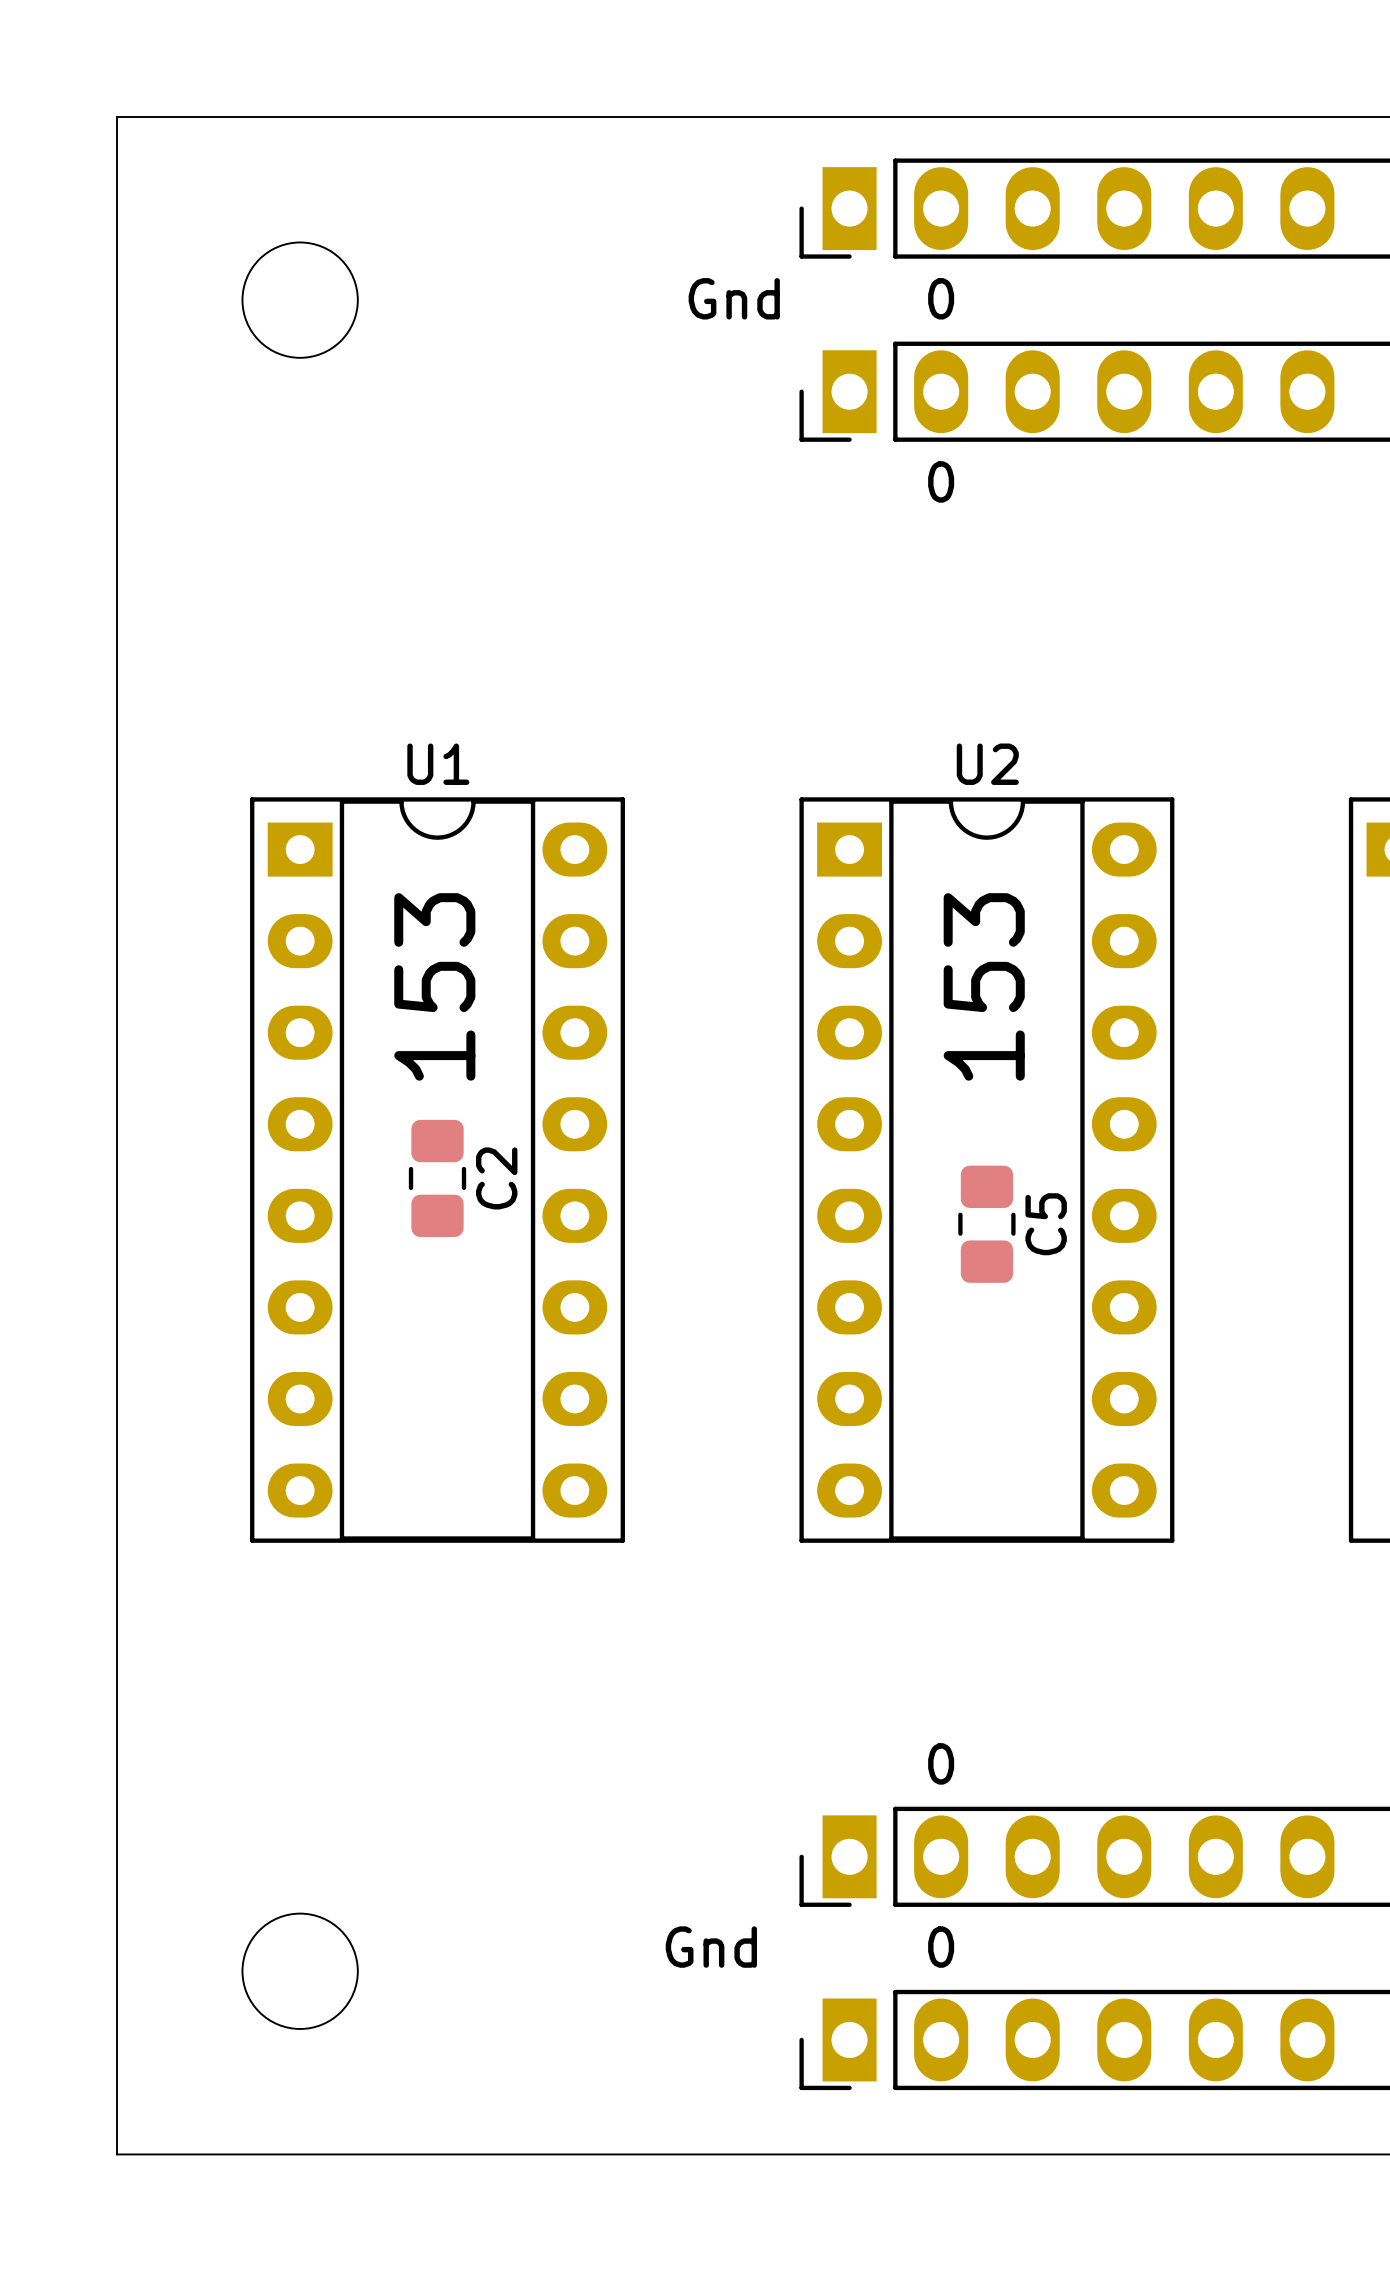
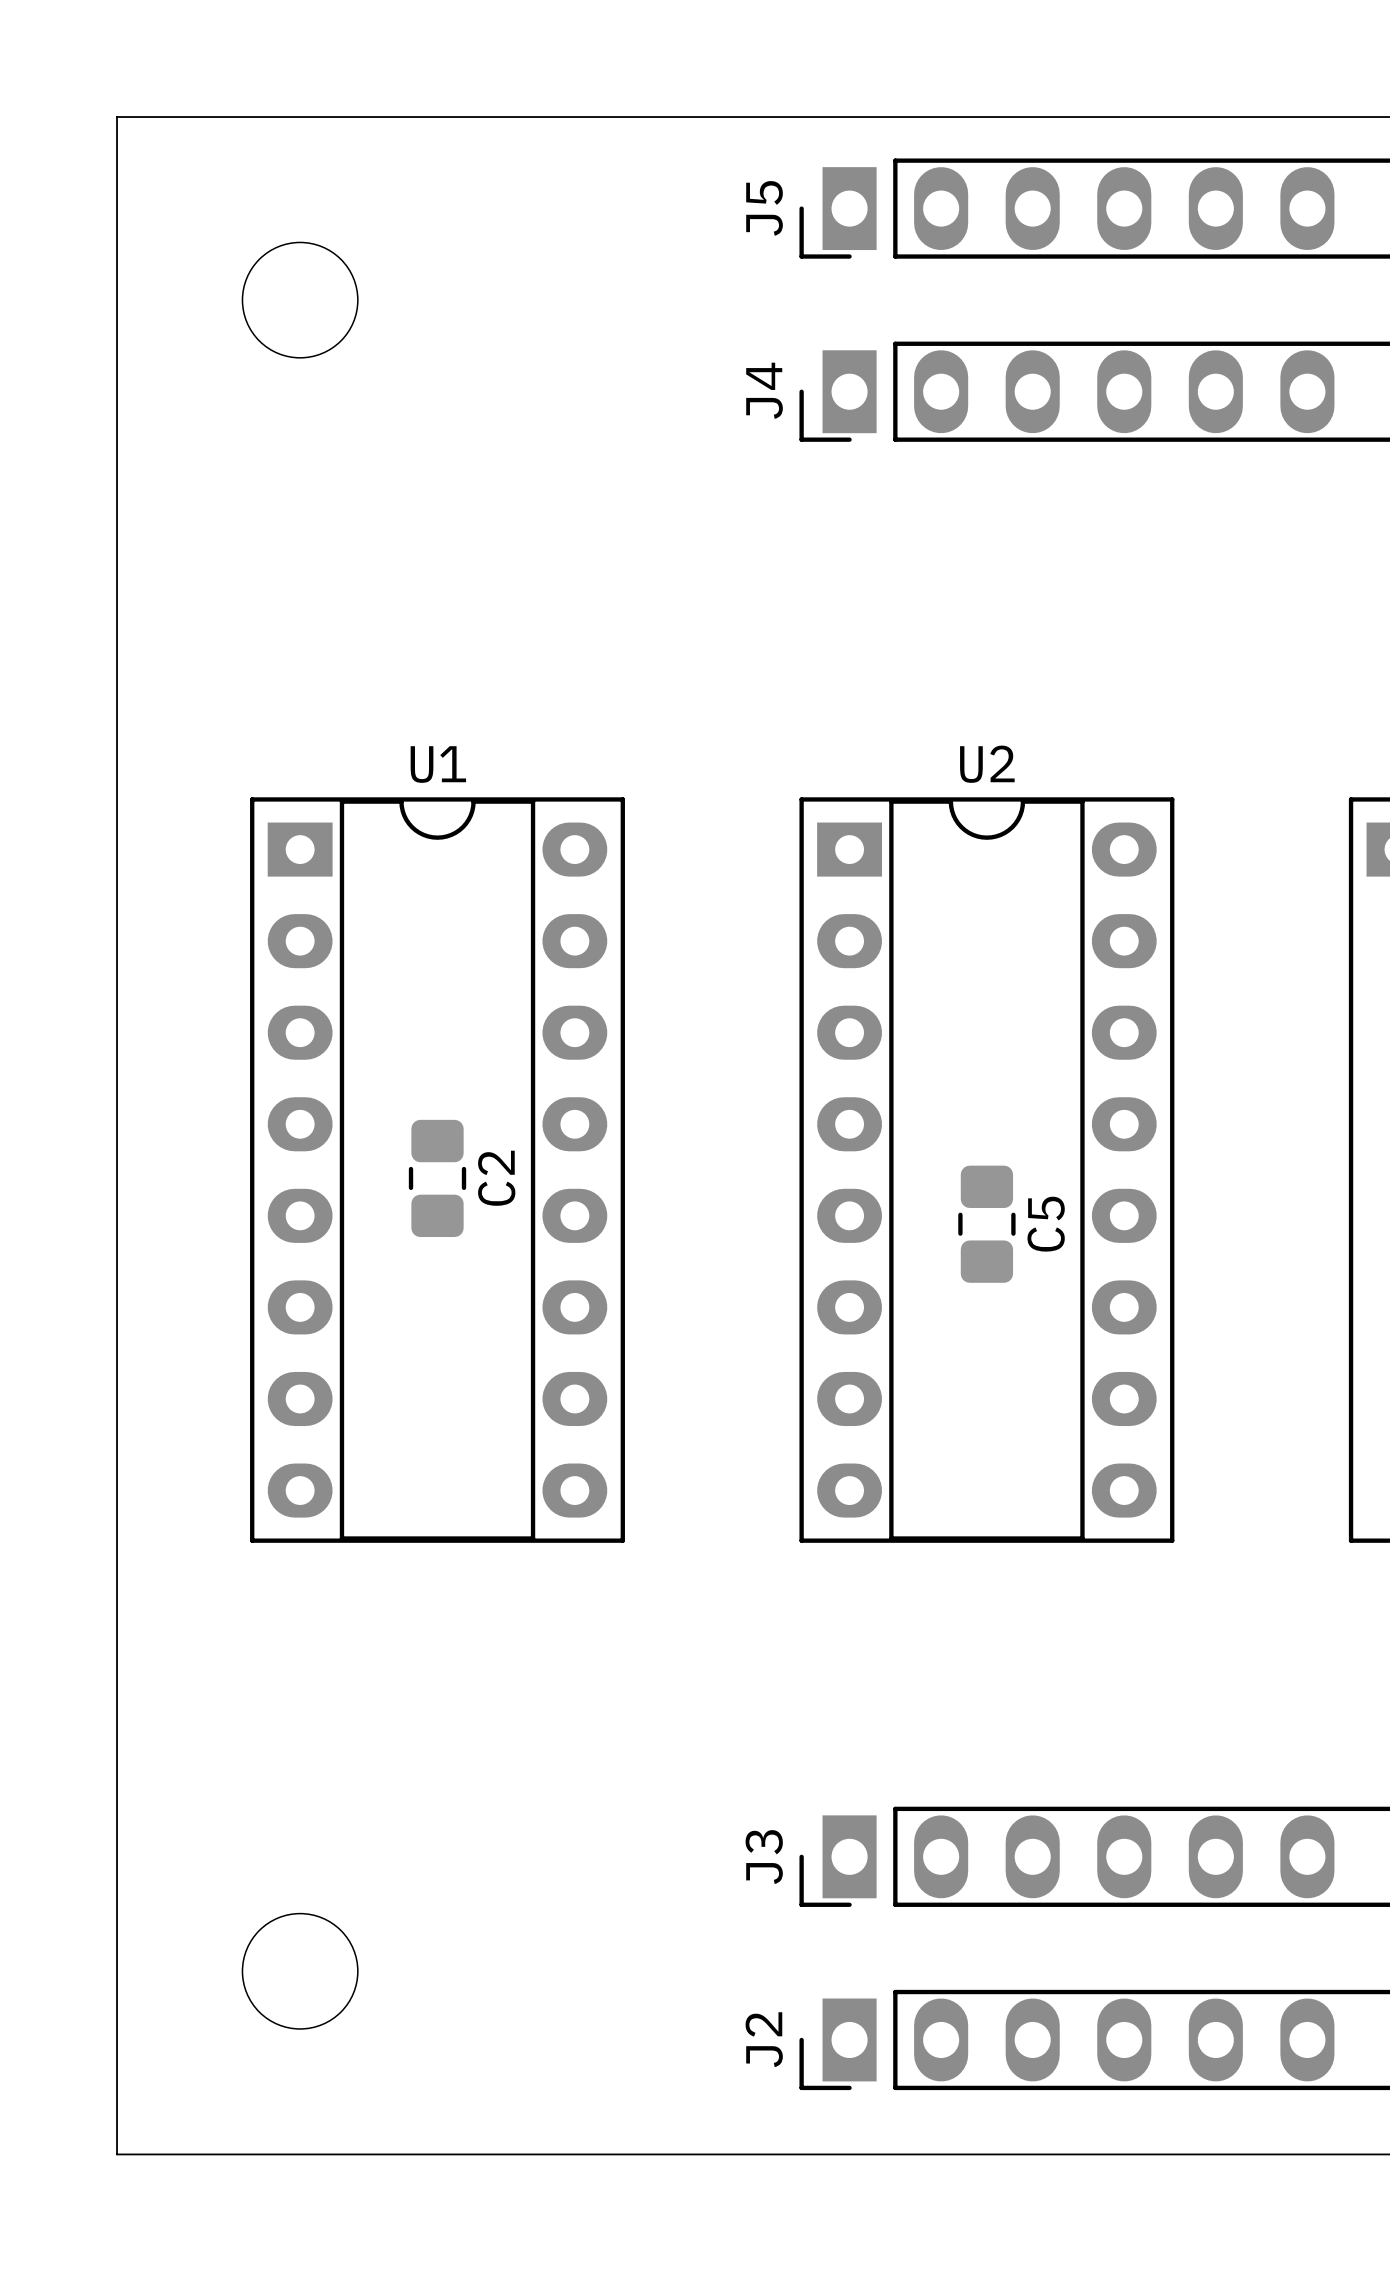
J5 name: none -> J5 (764, 208)
text: Gnd (734, 298) -> none
text: 0 (941, 298) -> none
J4 name: none -> J4 (764, 390)
text: 0 (941, 481) -> none
text: 153 (434, 986) -> none
text: 153 (984, 986) -> none
text: 0 (941, 1763) -> none
J3 name: none -> J3 (764, 1857)
text: Gnd (711, 1947) -> none
text: 0 (941, 1947) -> none
J2 name: none -> J2 (764, 2039)

